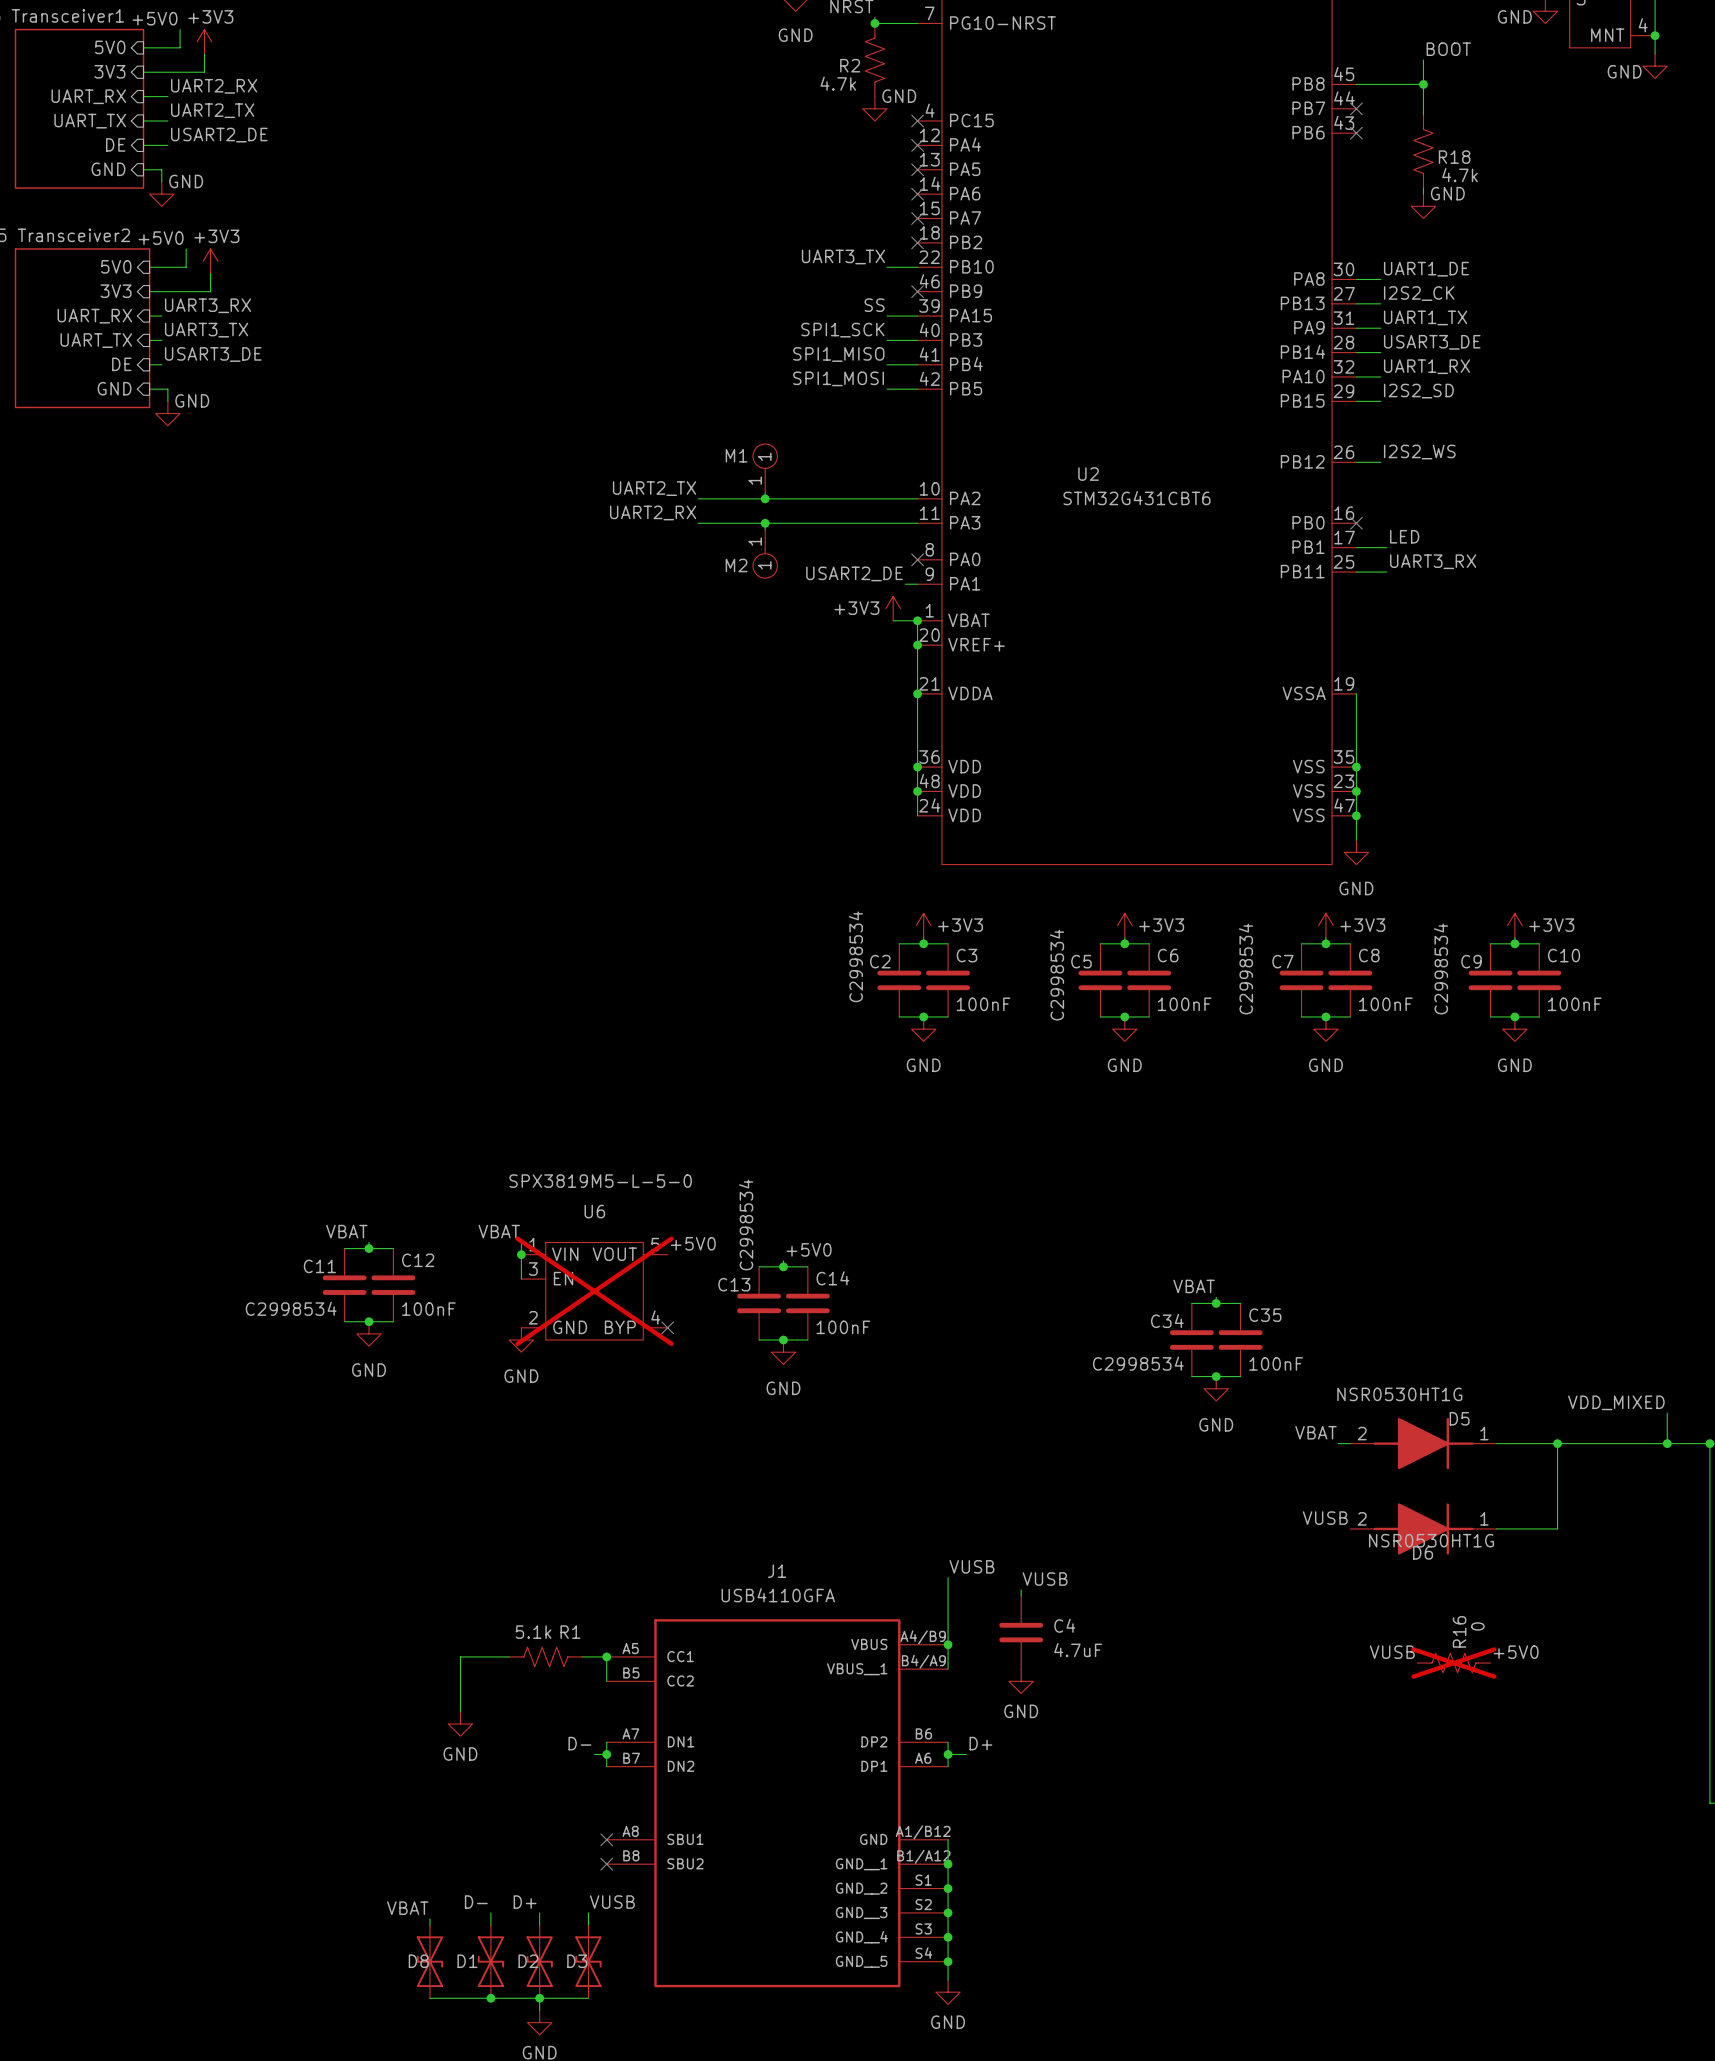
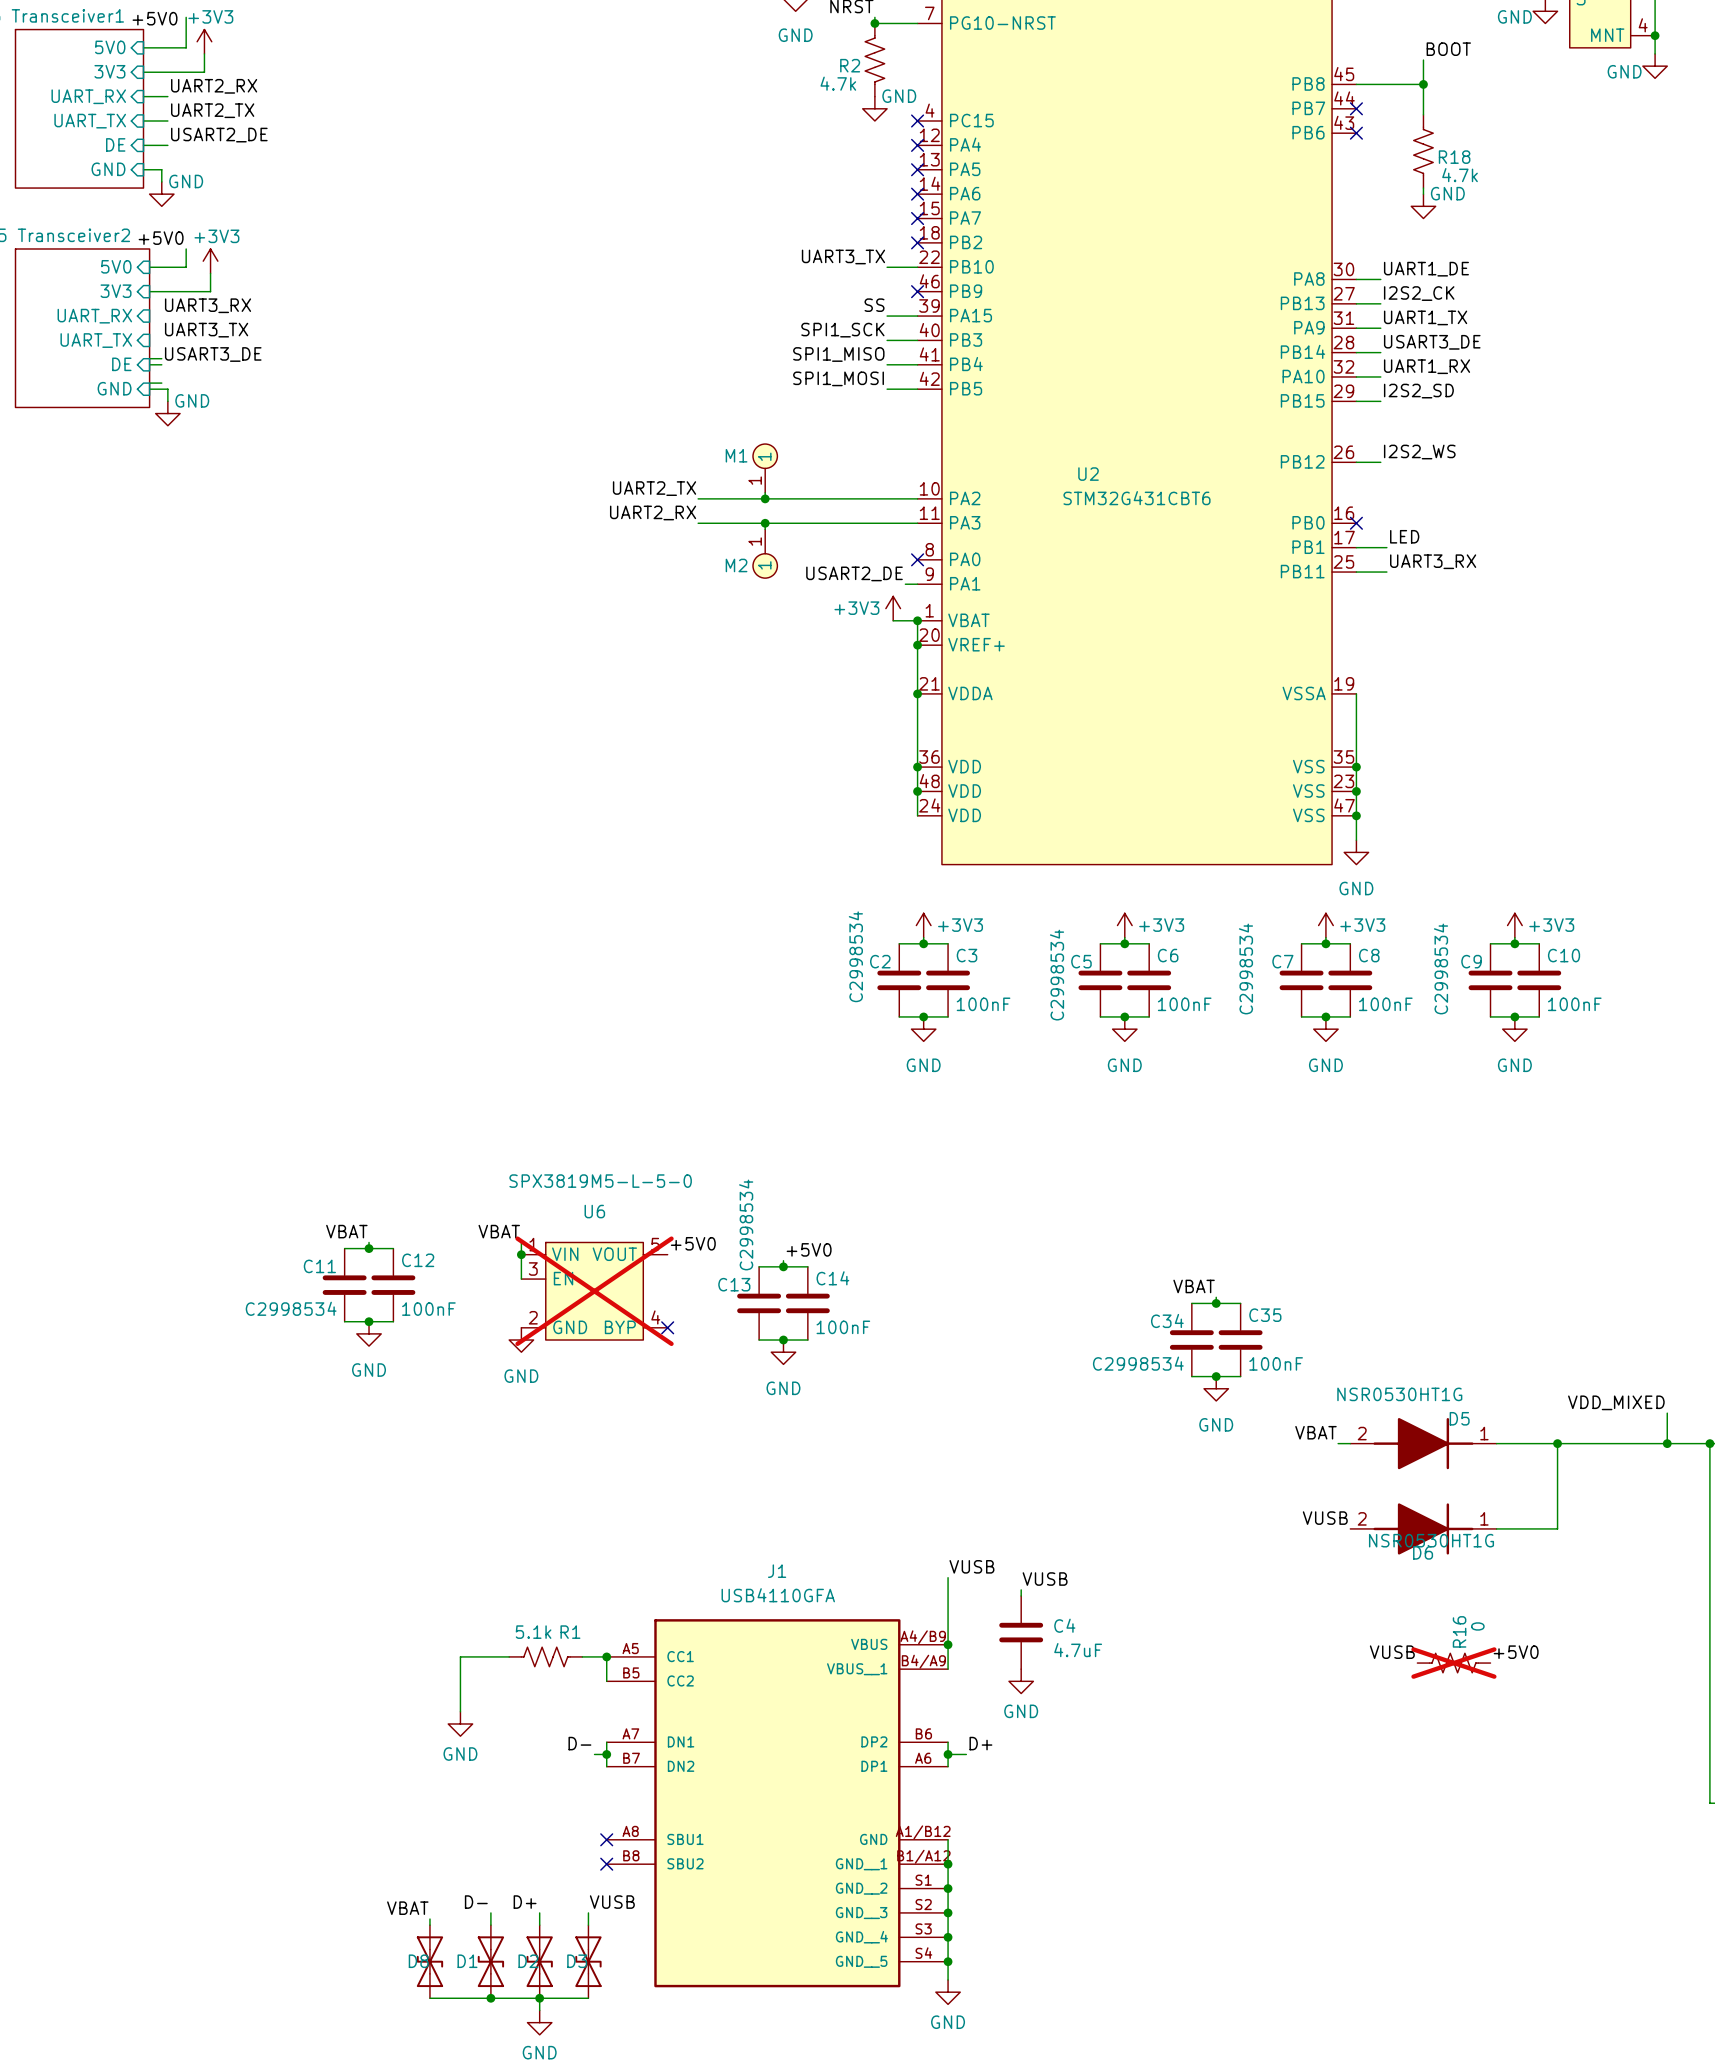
wire: (180, 29) (180, 47) -> (186, 17) (186, 47) (180, 47)
wire: (149, 316) (161, 316) -> (149, 358) (161, 358)
wire: (149, 340) (161, 340) -> (149, 383) (161, 383)

